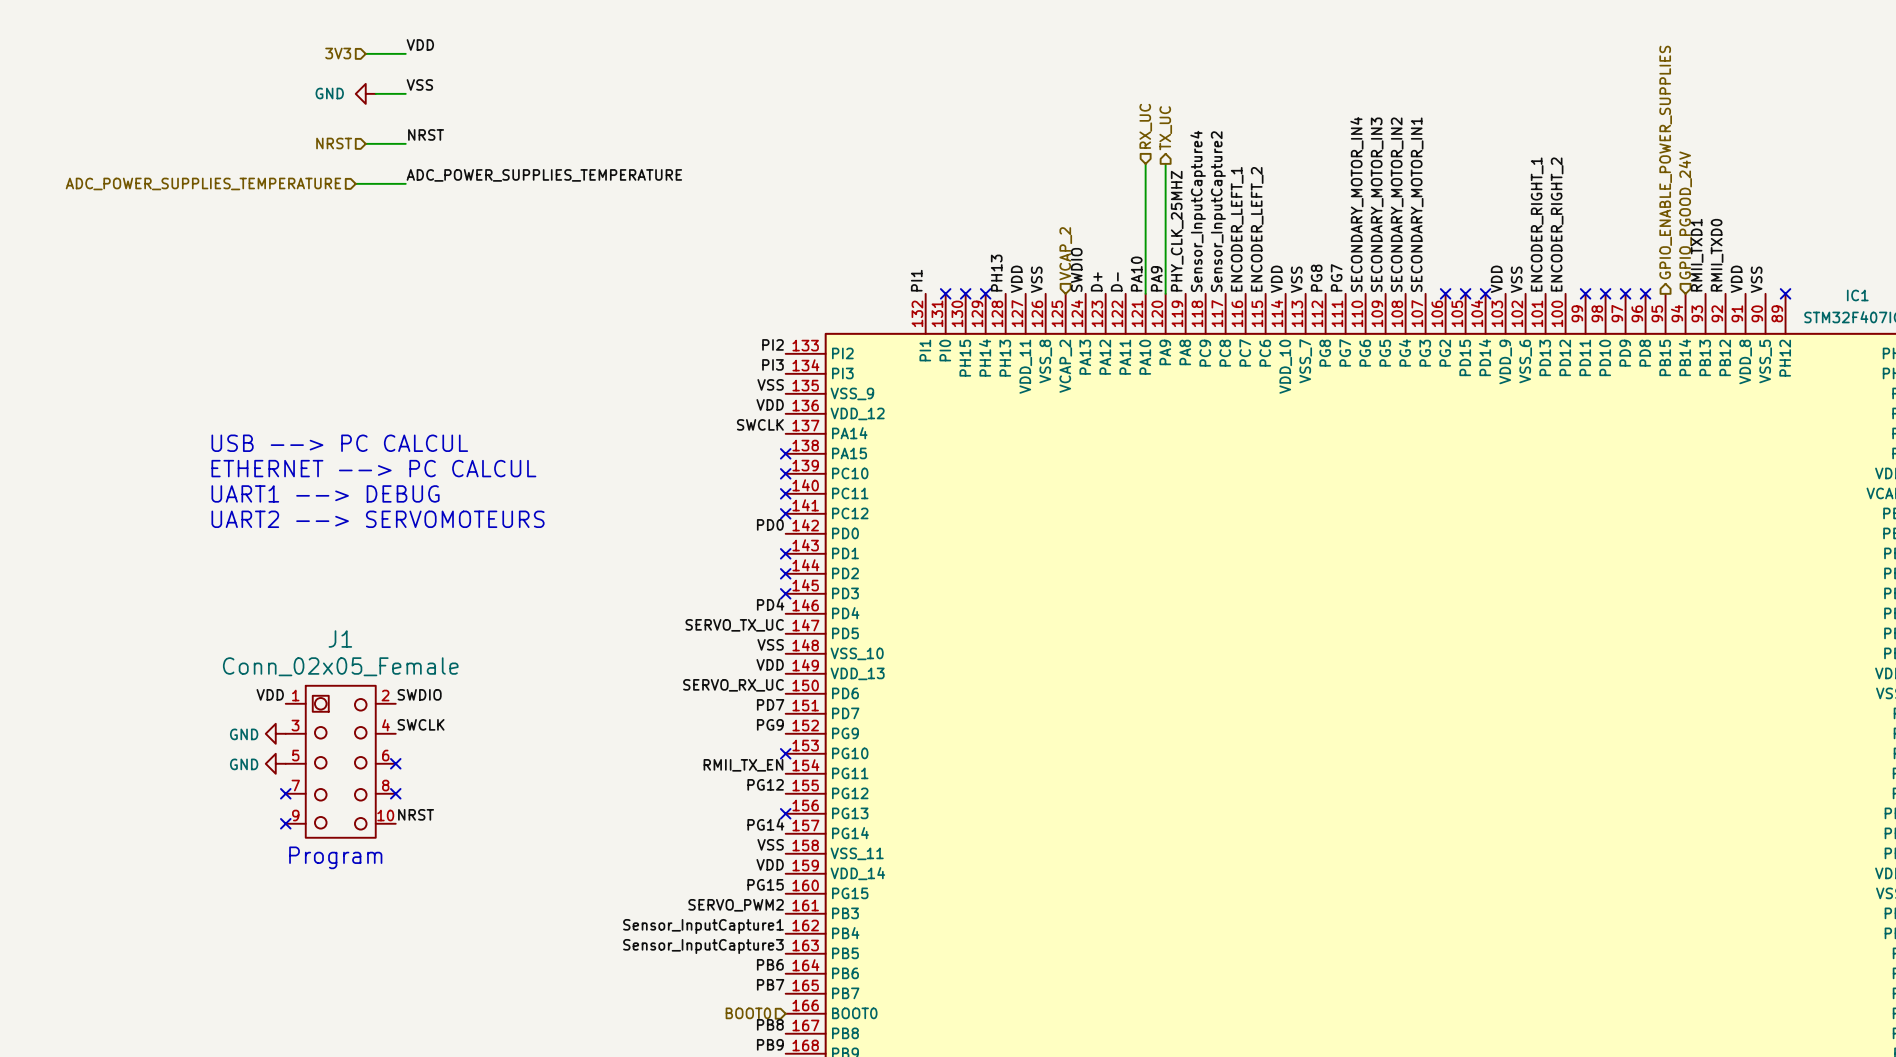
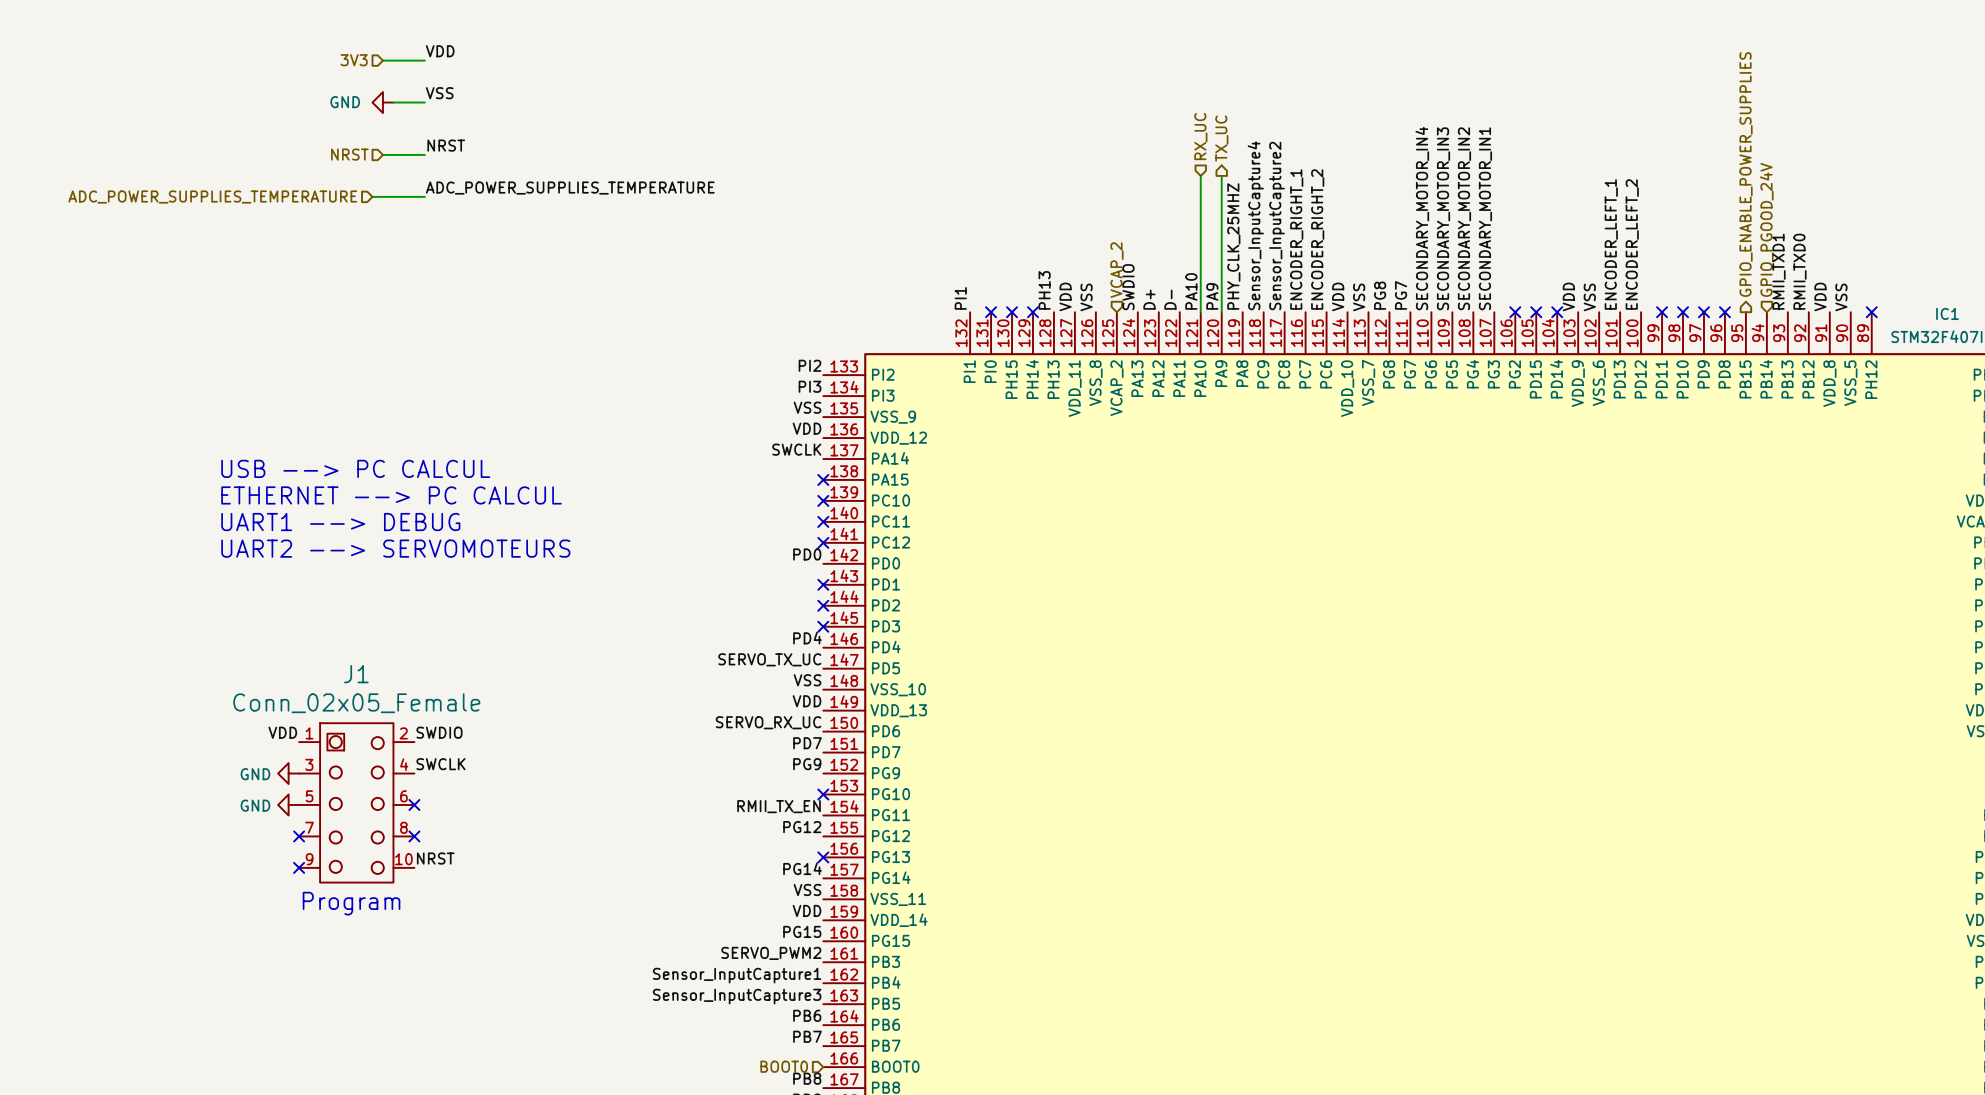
label: ENCODER_RIGHT_1 (1537, 224) -> ENCODER_LEFT_1 (1611, 244)
label: ENCODER_RIGHT_2 (1557, 224) -> ENCODER_LEFT_2 (1632, 244)
label: ENCODER_LEFT_1 (1237, 229) -> ENCODER_RIGHT_1 (1296, 239)
label: ENCODER_LEFT_2 (1257, 229) -> ENCODER_RIGHT_2 (1317, 239)

